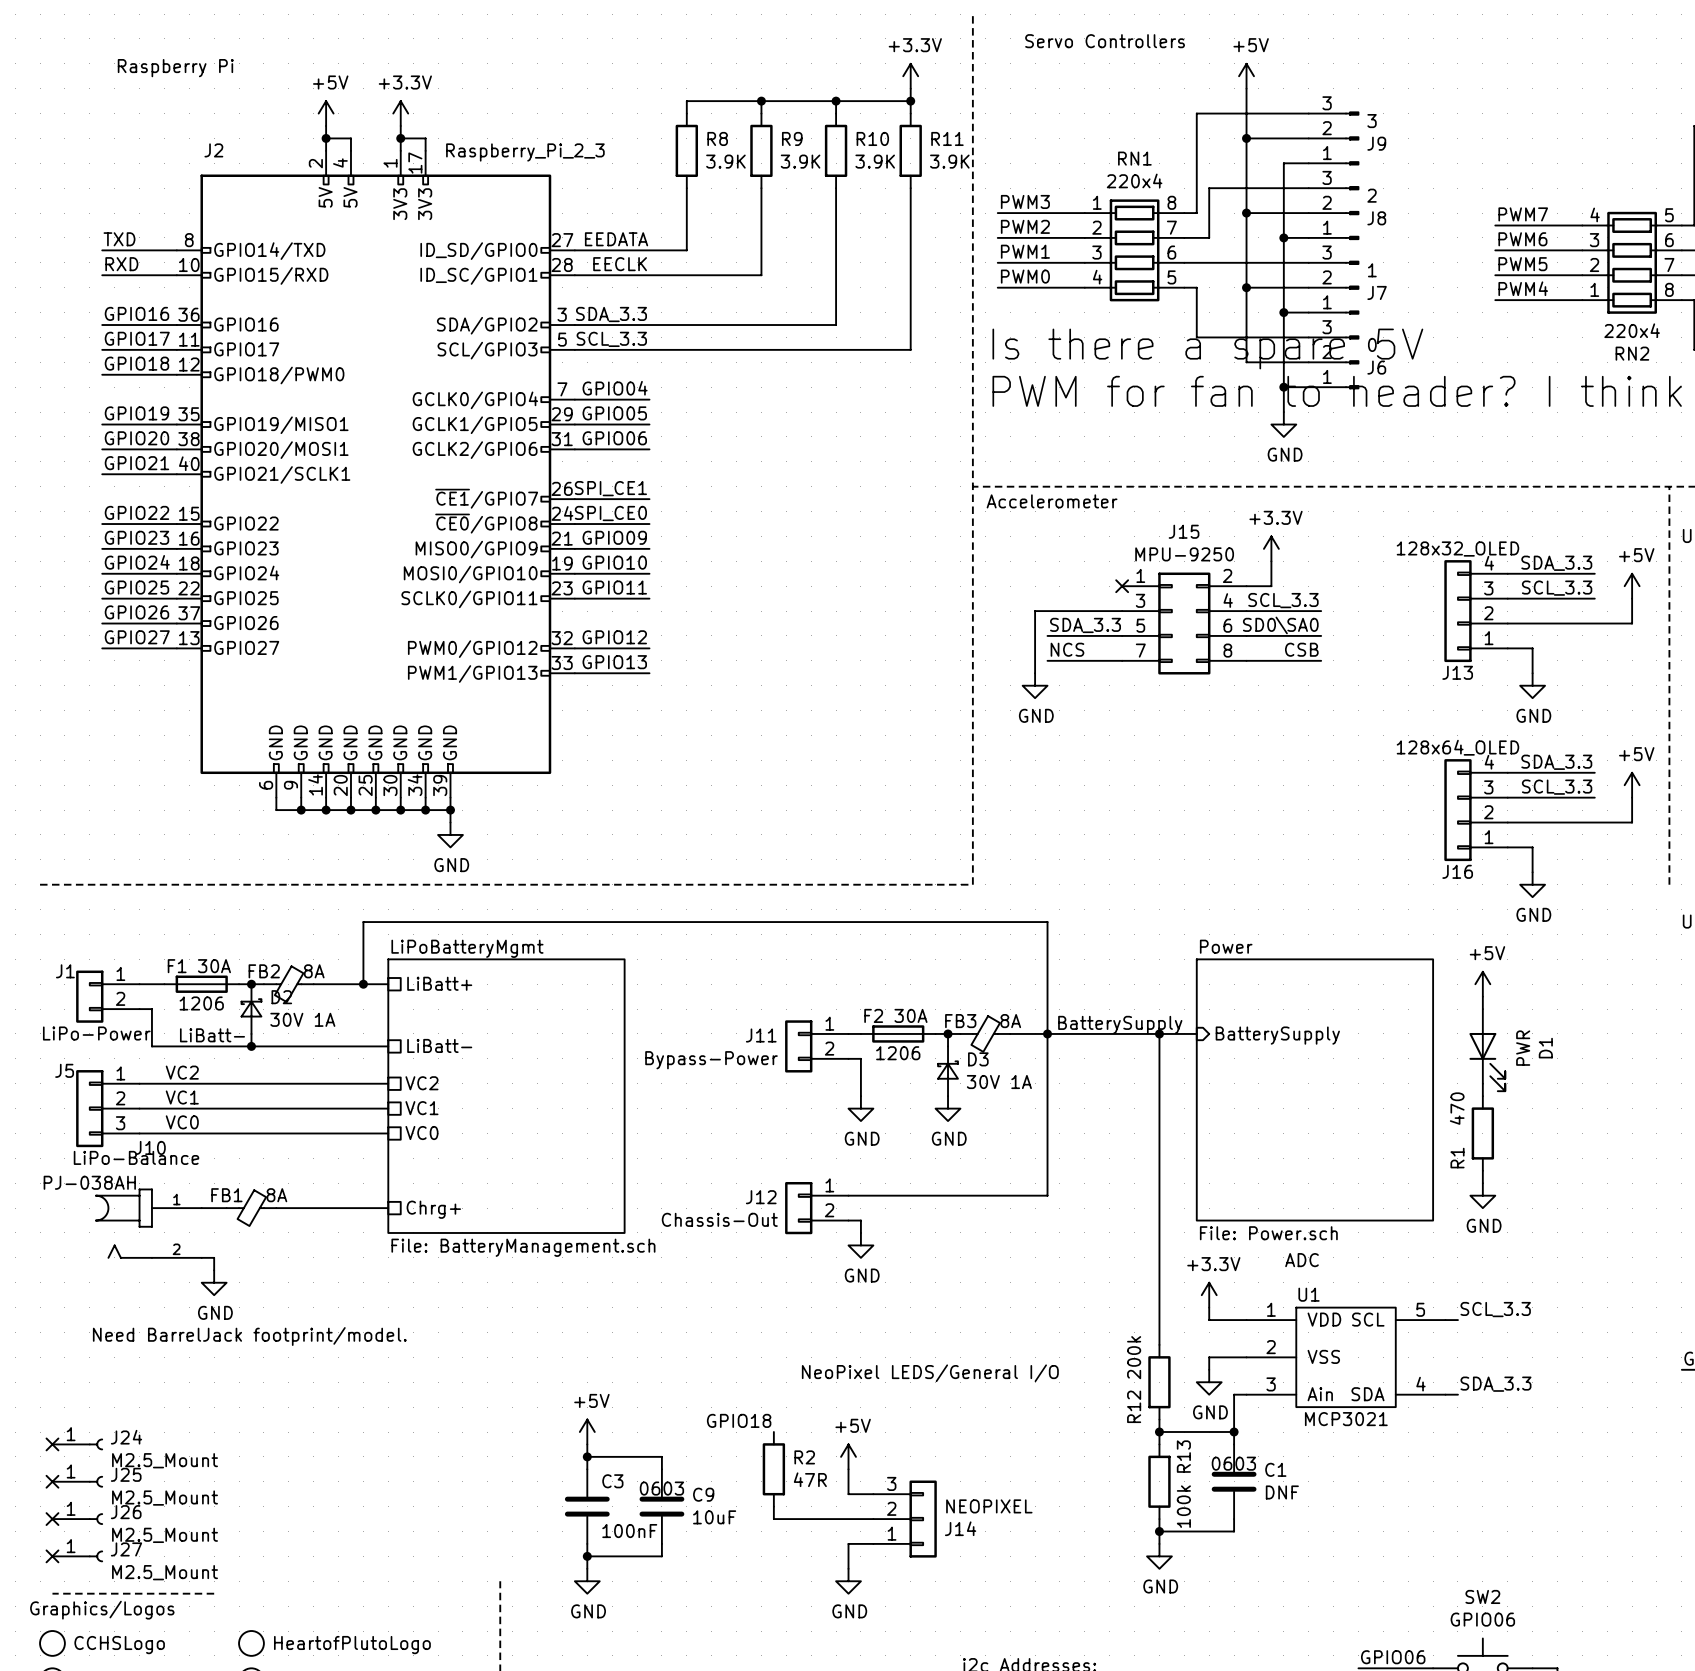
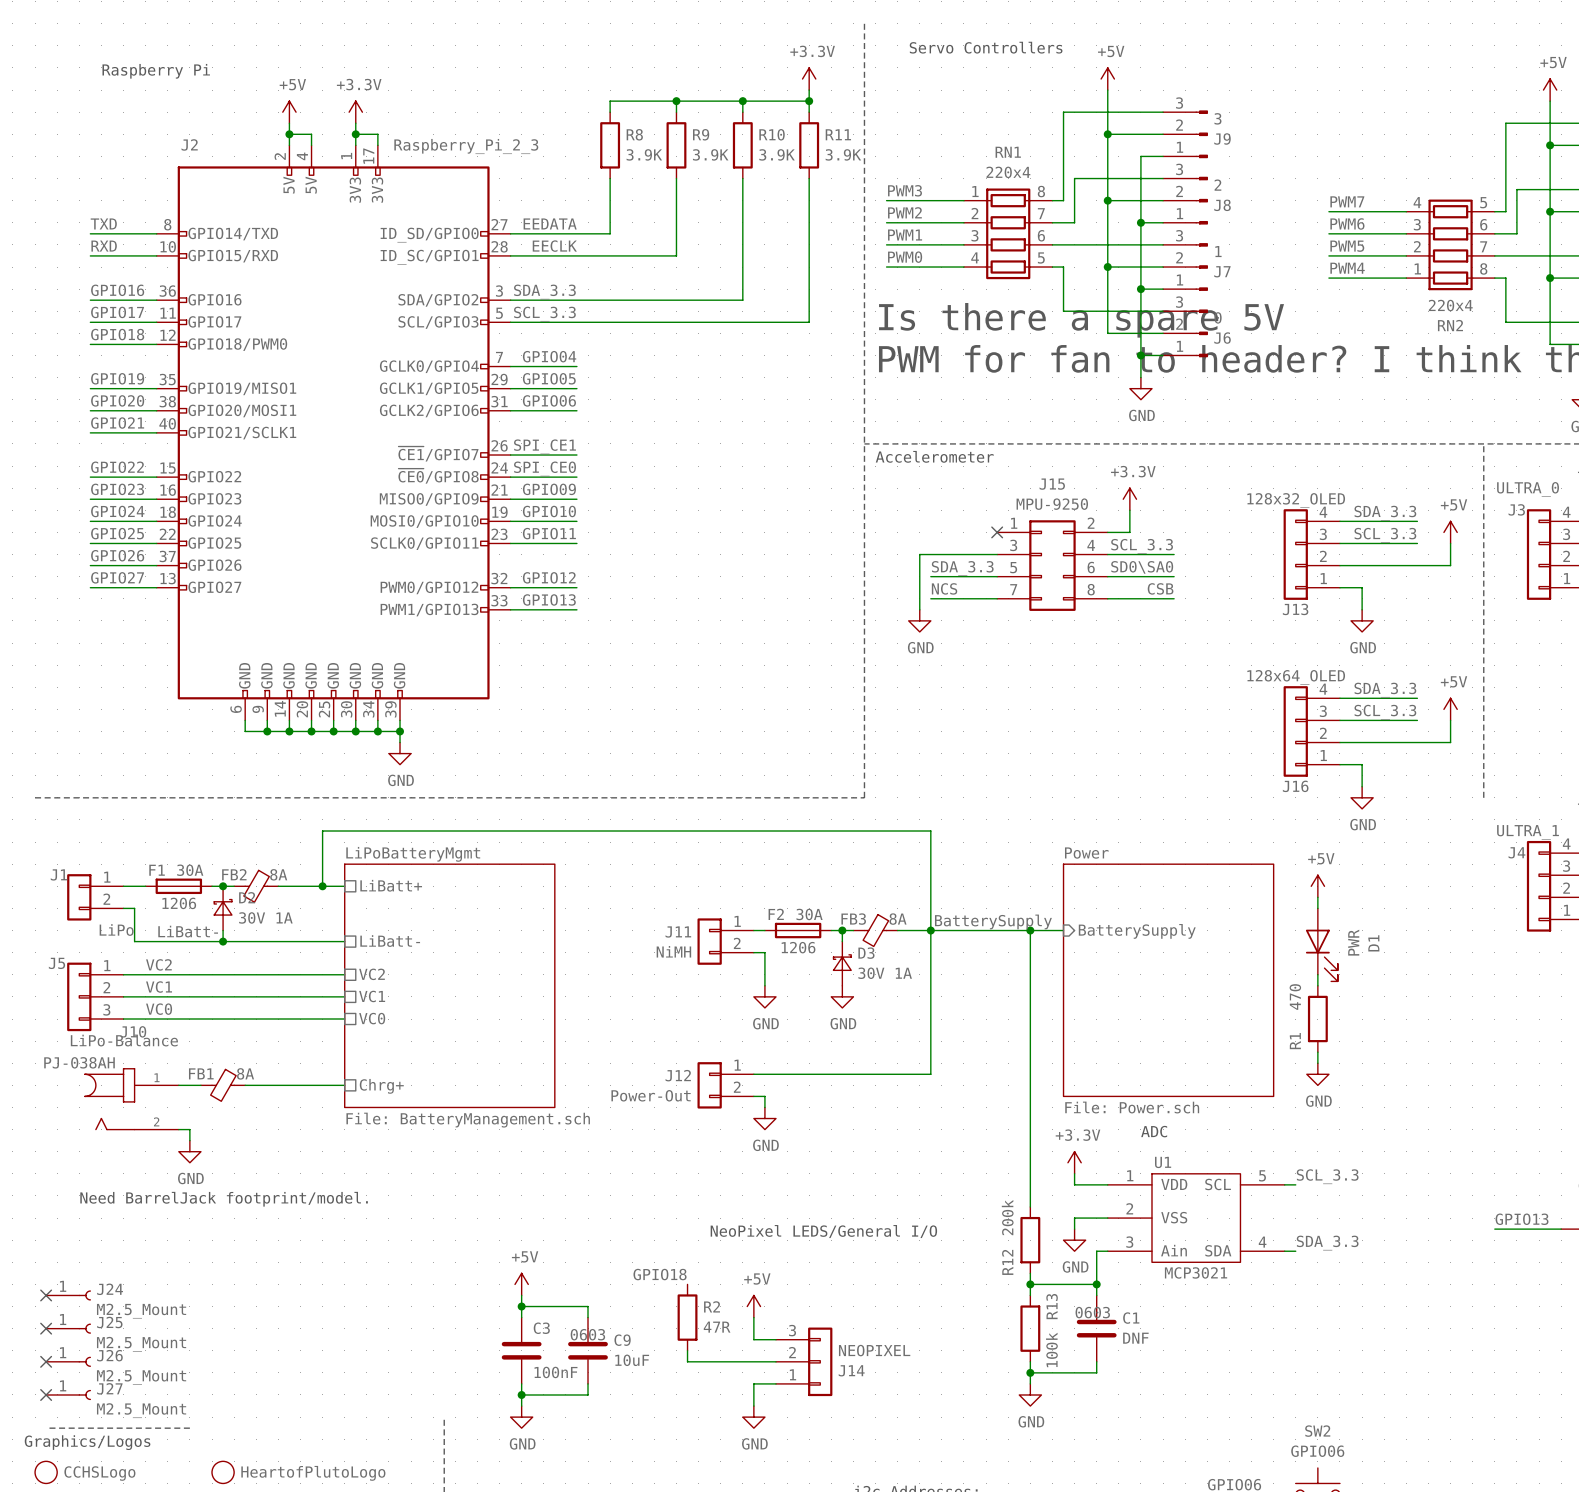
J1 value: LiPo-Power (96, 1033) -> LiPo (116, 929)
J11 value: Bypass-Power (711, 1060) -> NiMH (673, 951)
J12 value: Chassis-Out (719, 1219) -> Power-Out (651, 1095)

